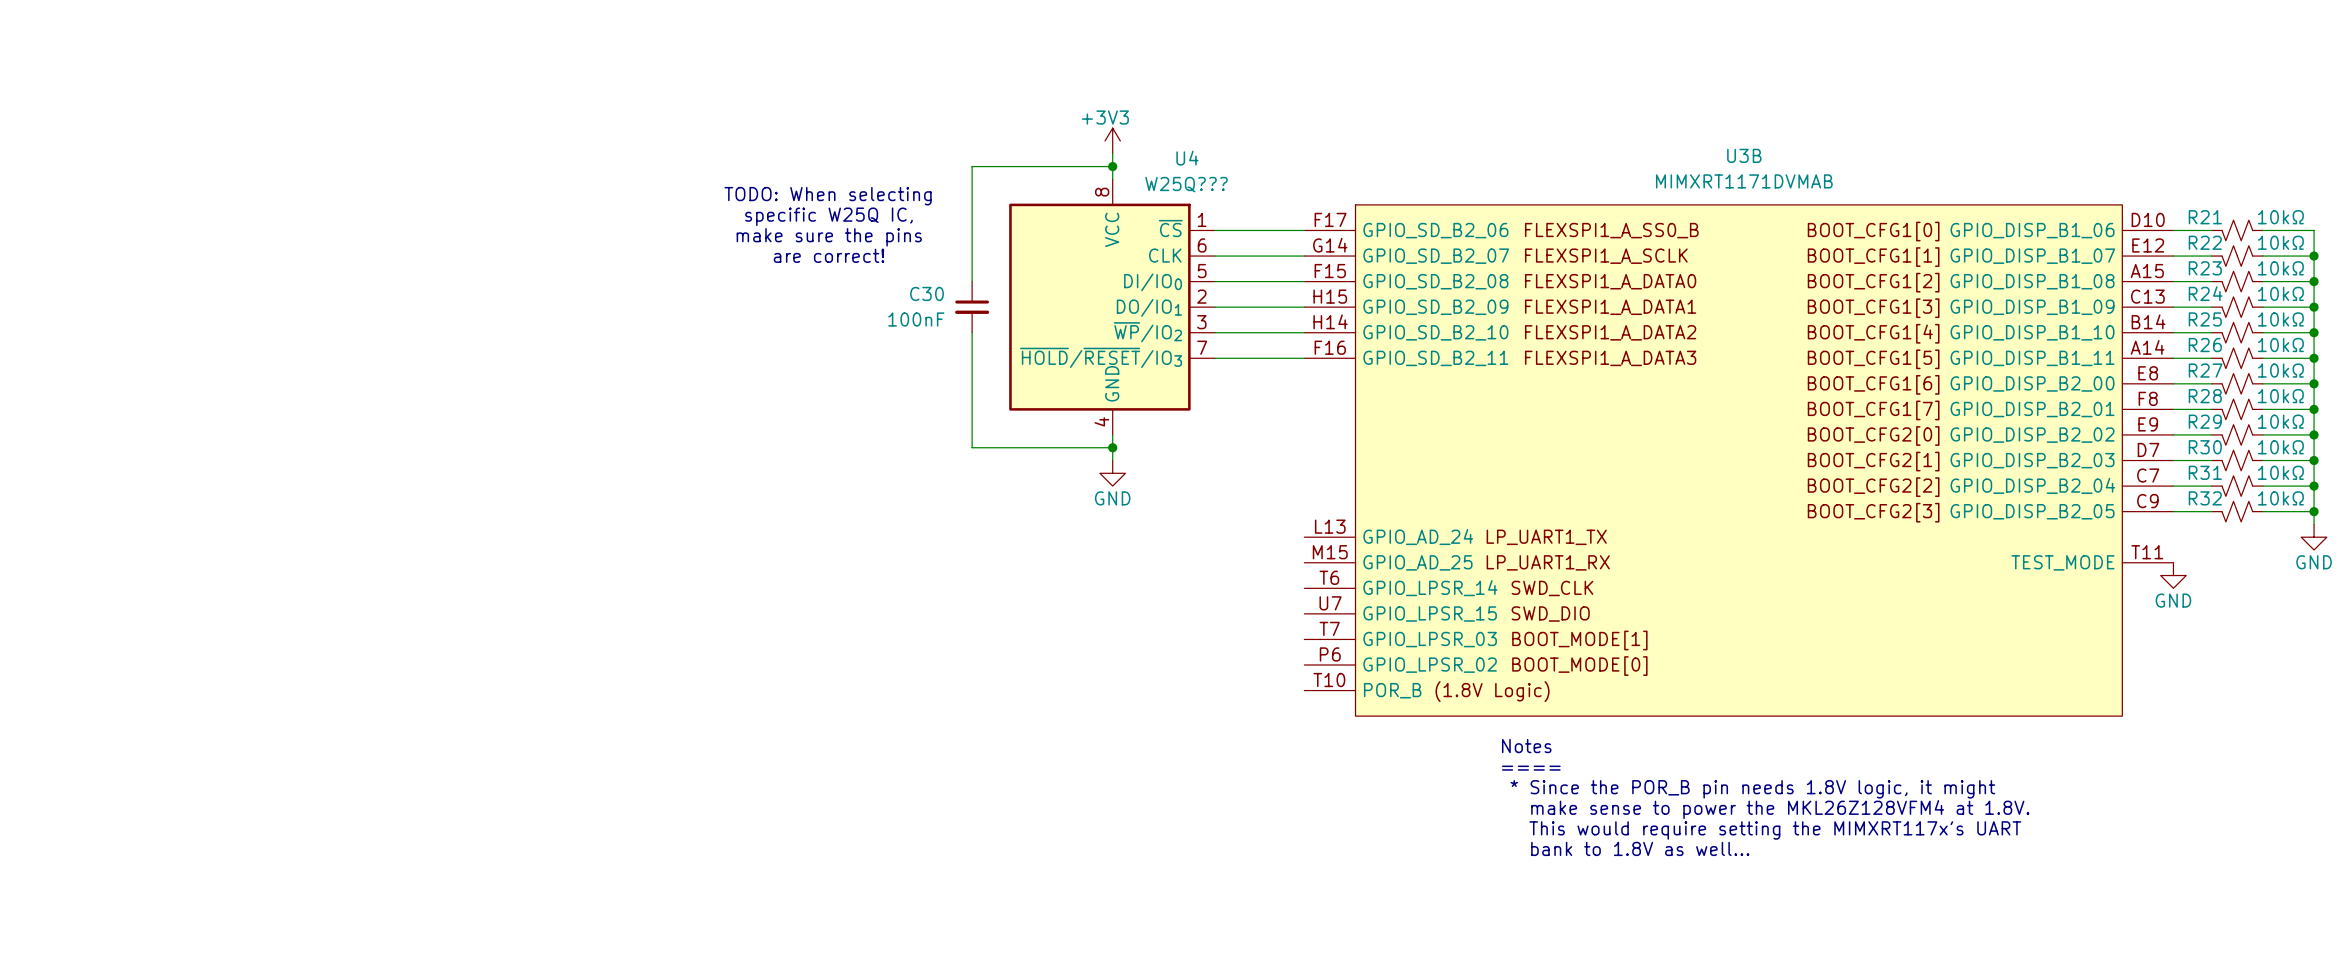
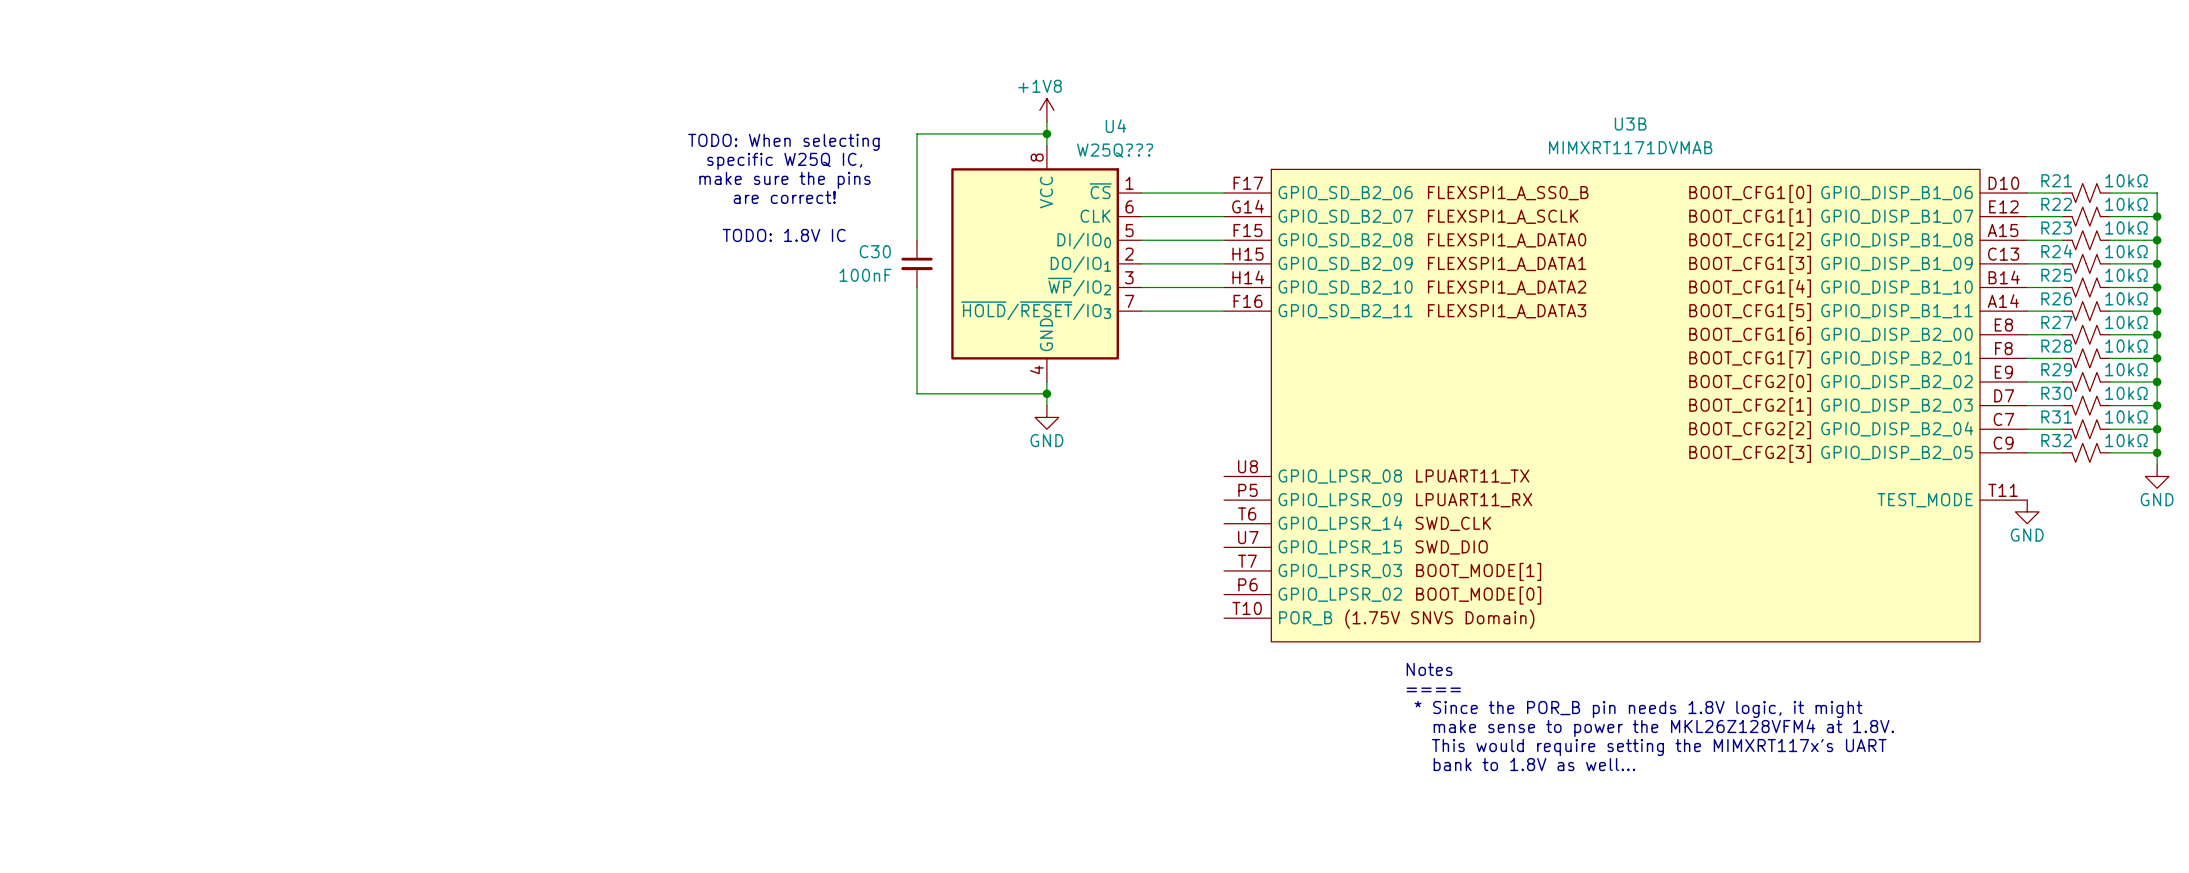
power symbol: +3V3 (1112, 141) -> +1V8 (1046, 110)
text: none -> TODO: When selecting (783, 142)
text: TODO: When selecting (828, 196) -> specific W25Q IC, (784, 161)
U3B symbol: [1304, 204, 2174, 717] -> [1224, 169, 2028, 642]
text: specific W25Q IC, (828, 216) -> make sure the pins (785, 180)
text: make sure the pins (829, 237) -> are correct! (784, 197)
text: are correct! (828, 255) -> none
text: none -> TODO: 1.8V IC (784, 235)

